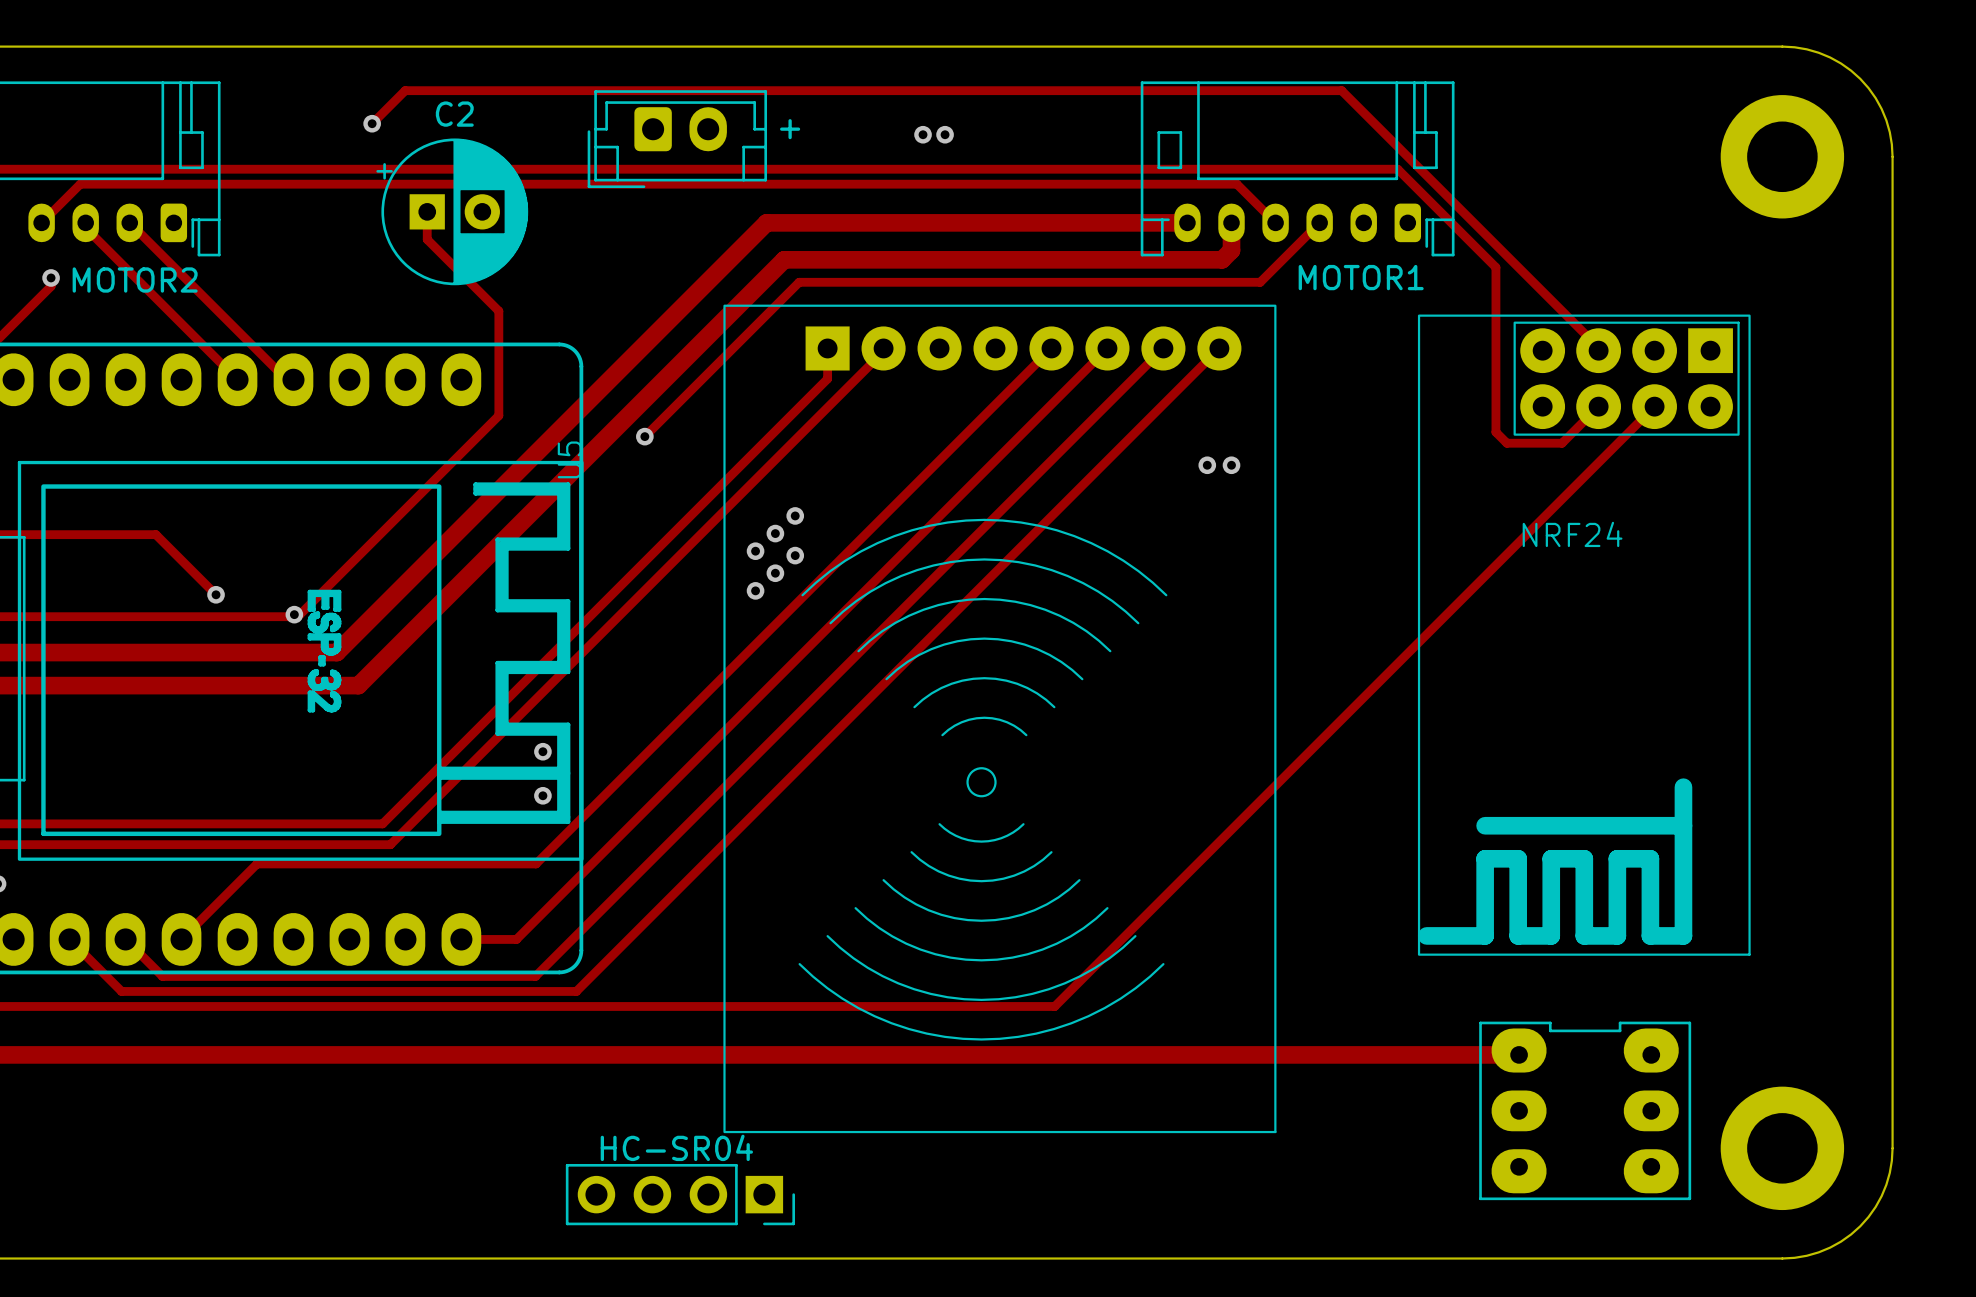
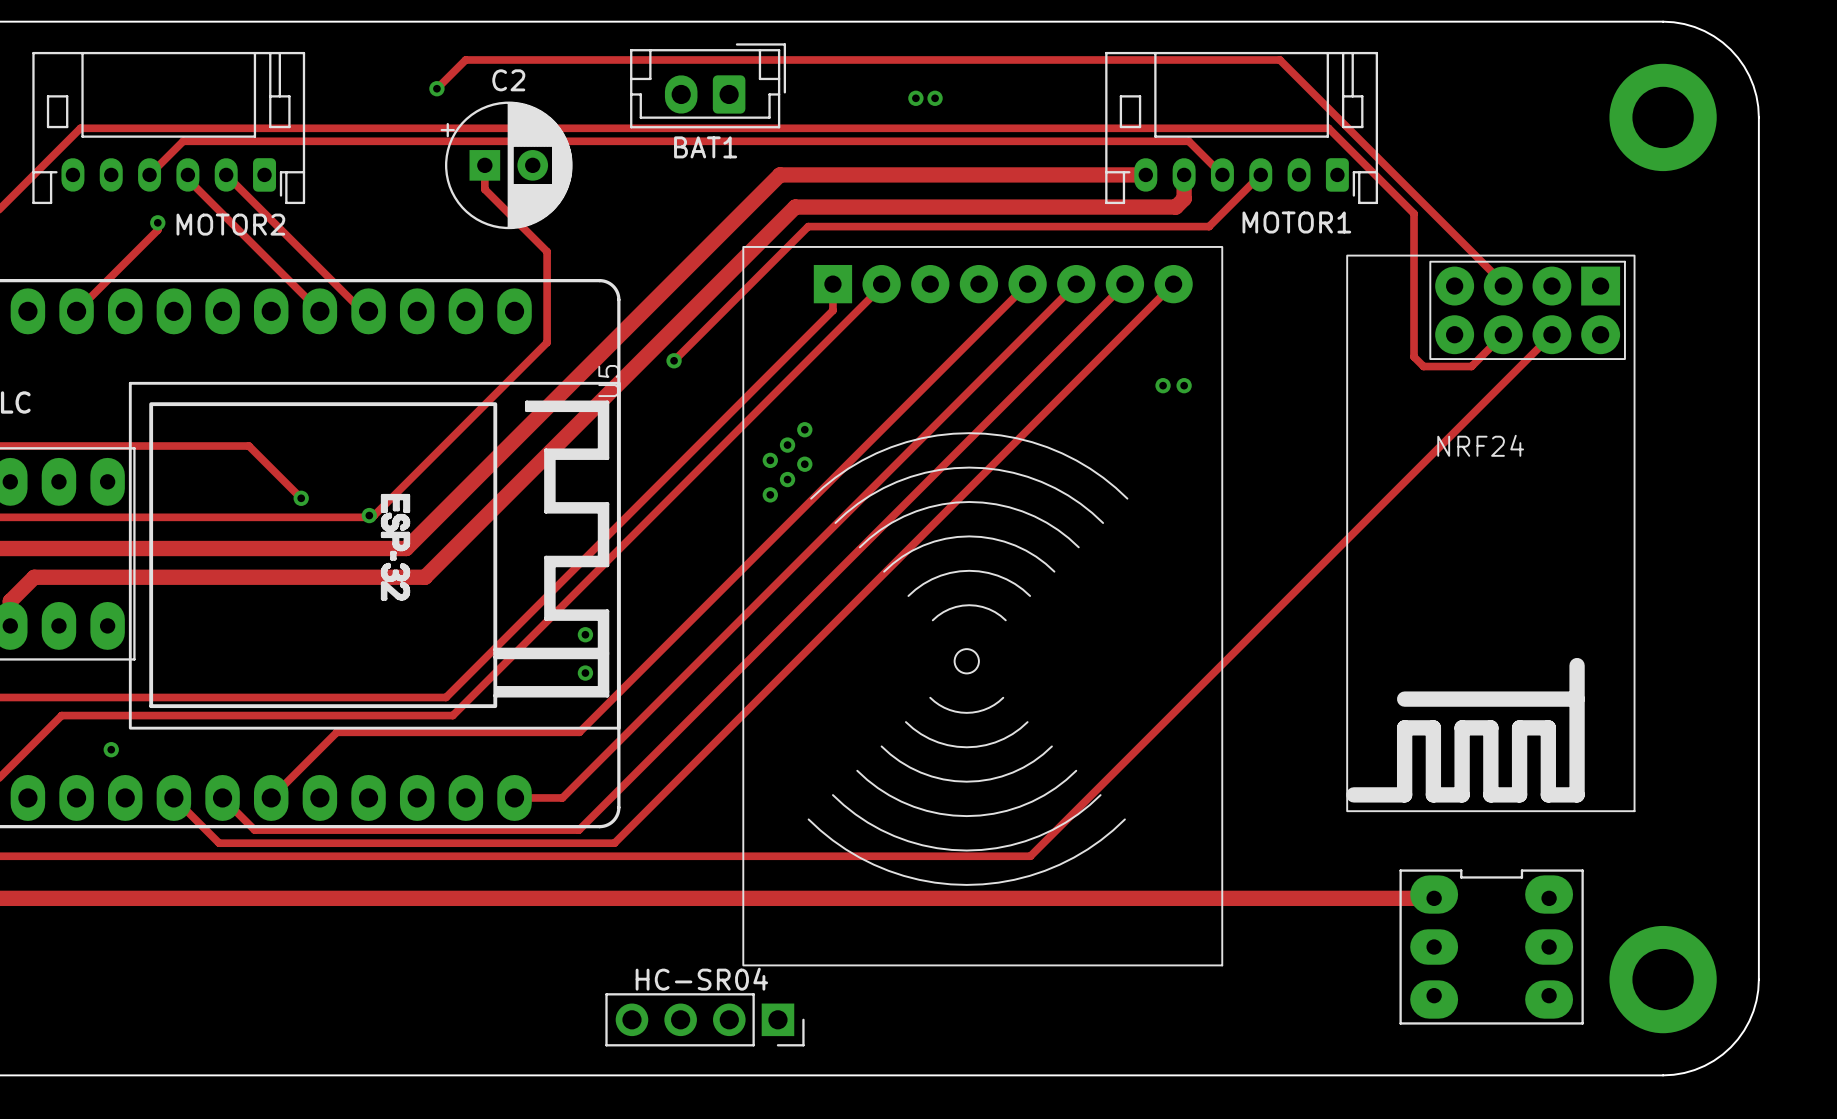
BAT1: none -> (708, 85)
text: + (790, 129) -> none
part: (677, 139) -> none

